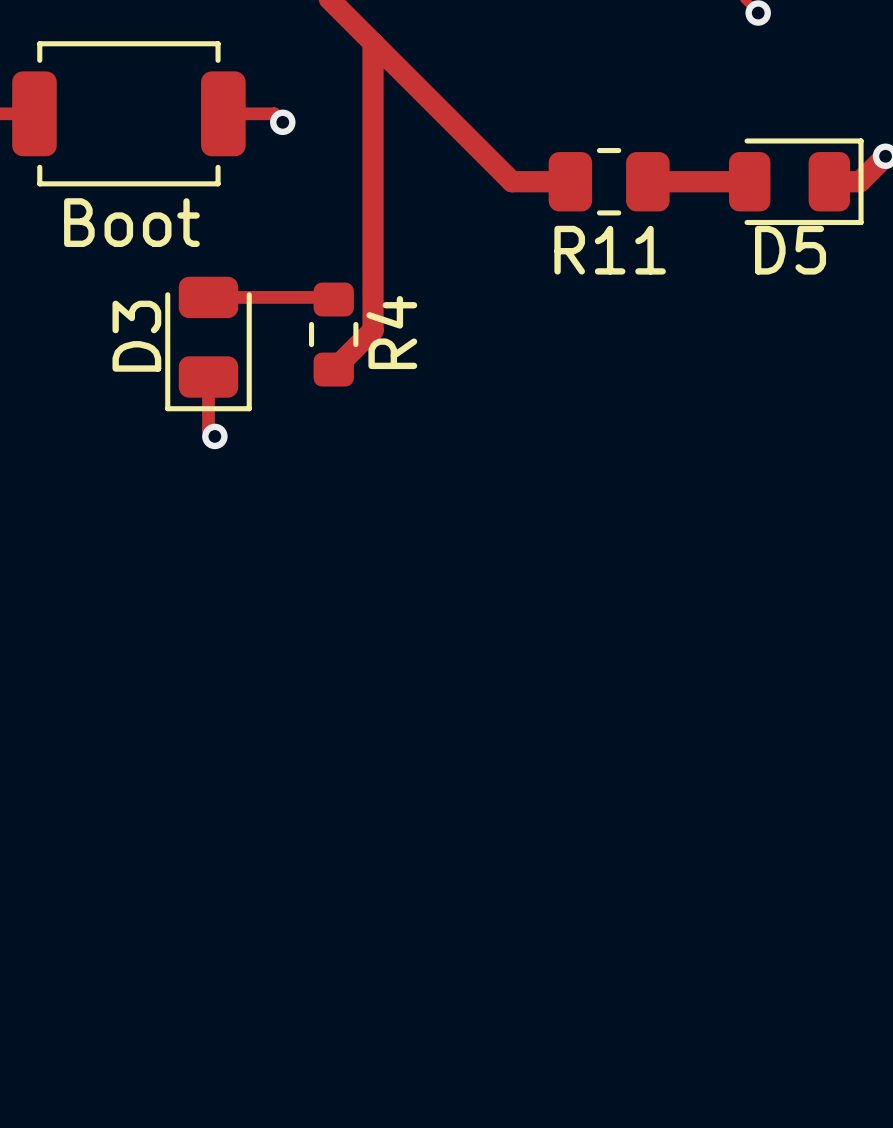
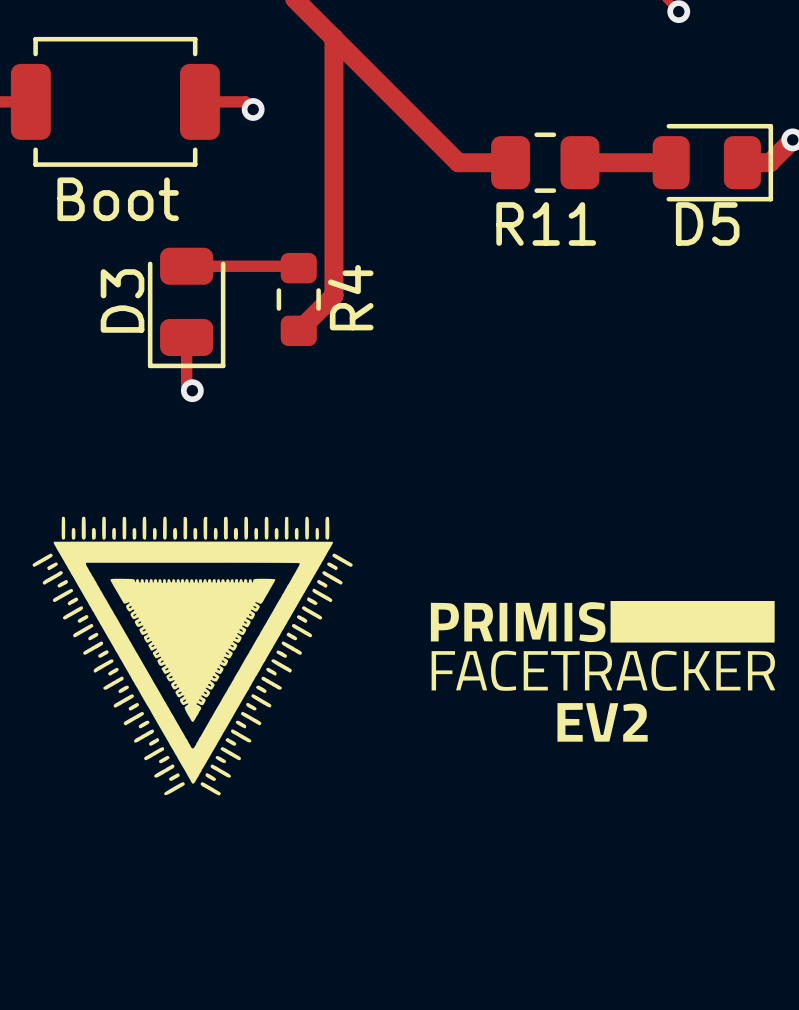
drawing: none -> [32, 516, 353, 796]
drawing: none -> [430, 600, 776, 742]

